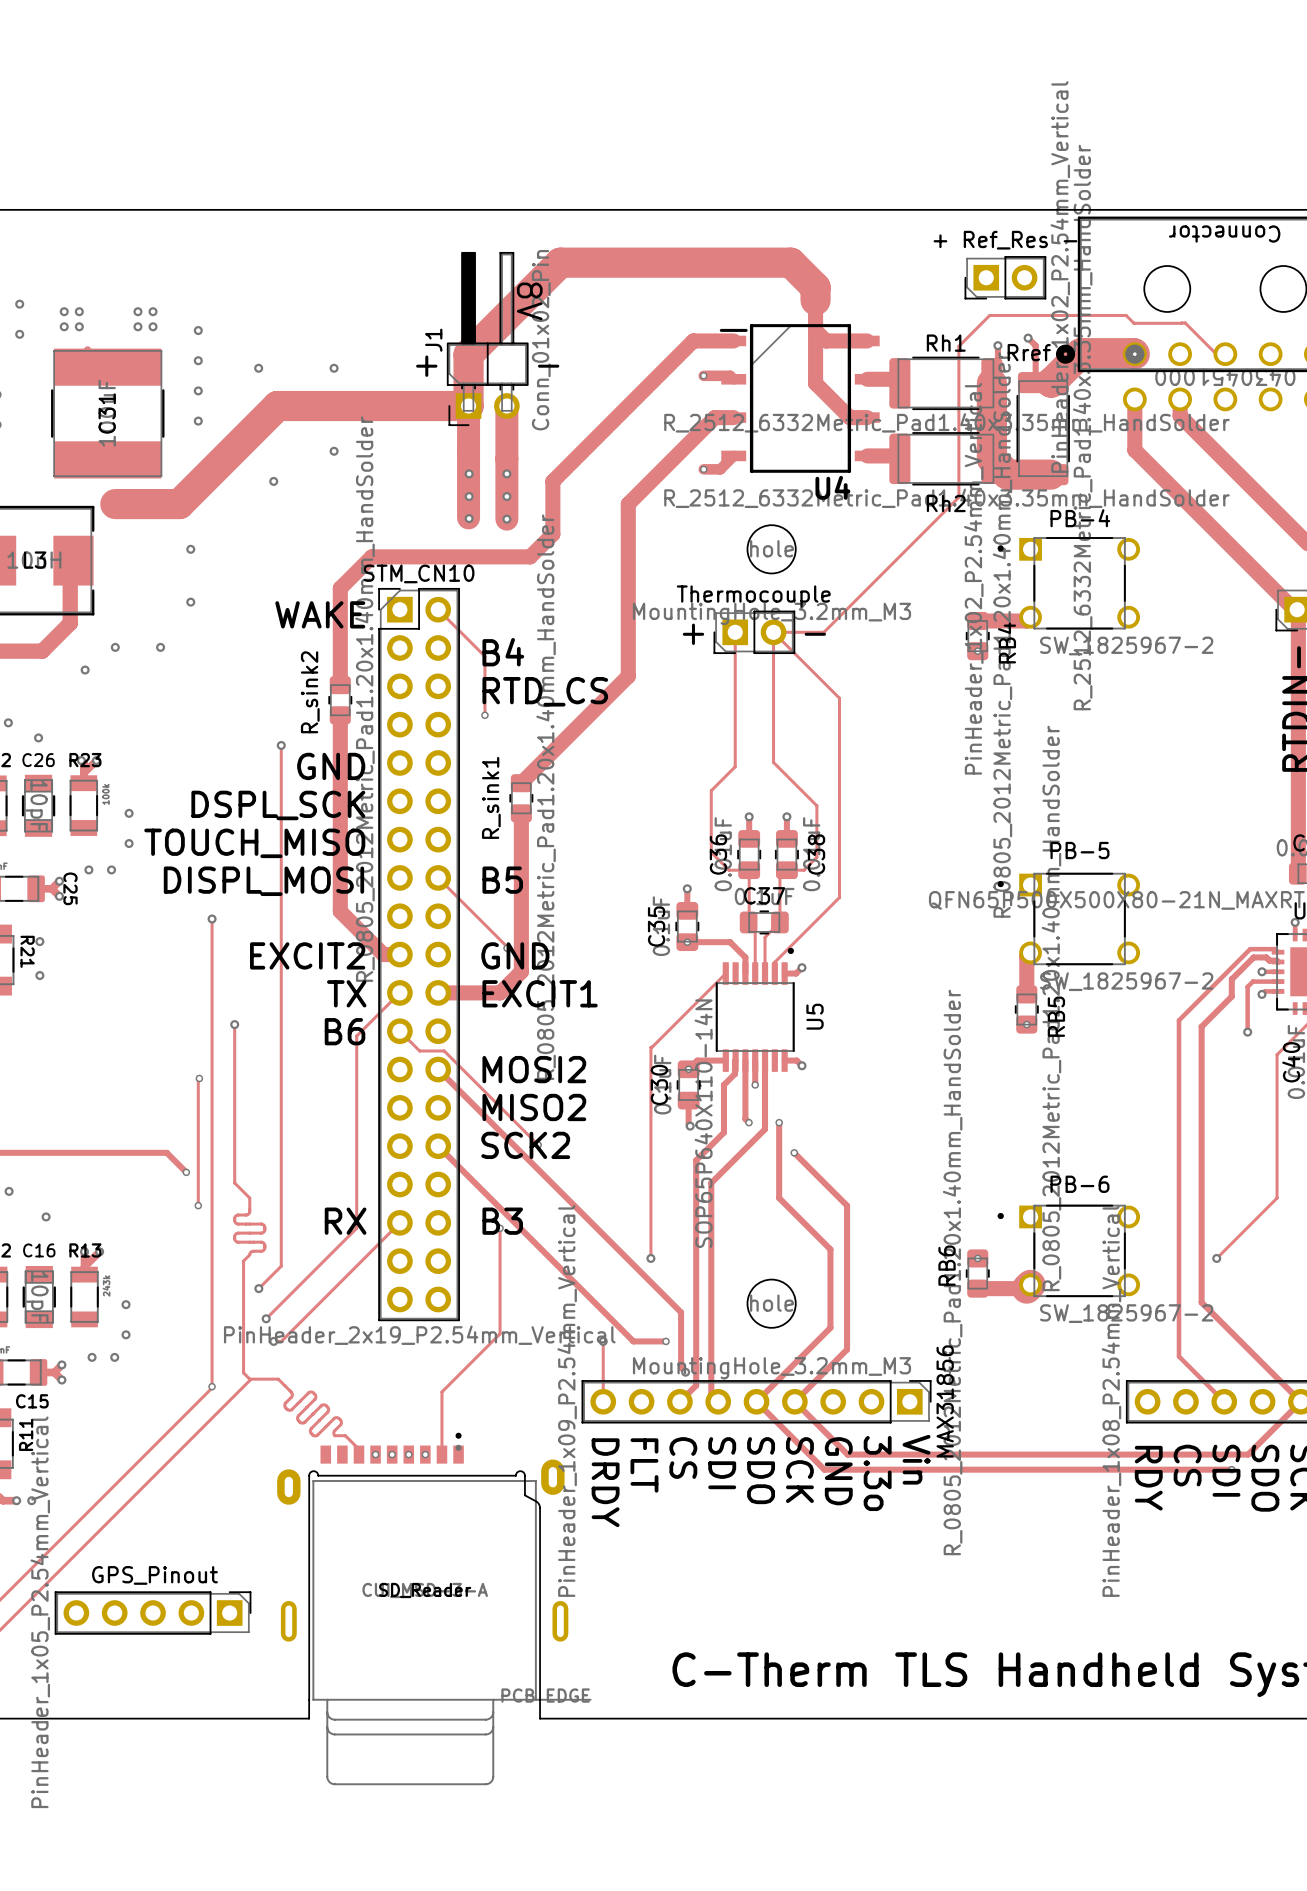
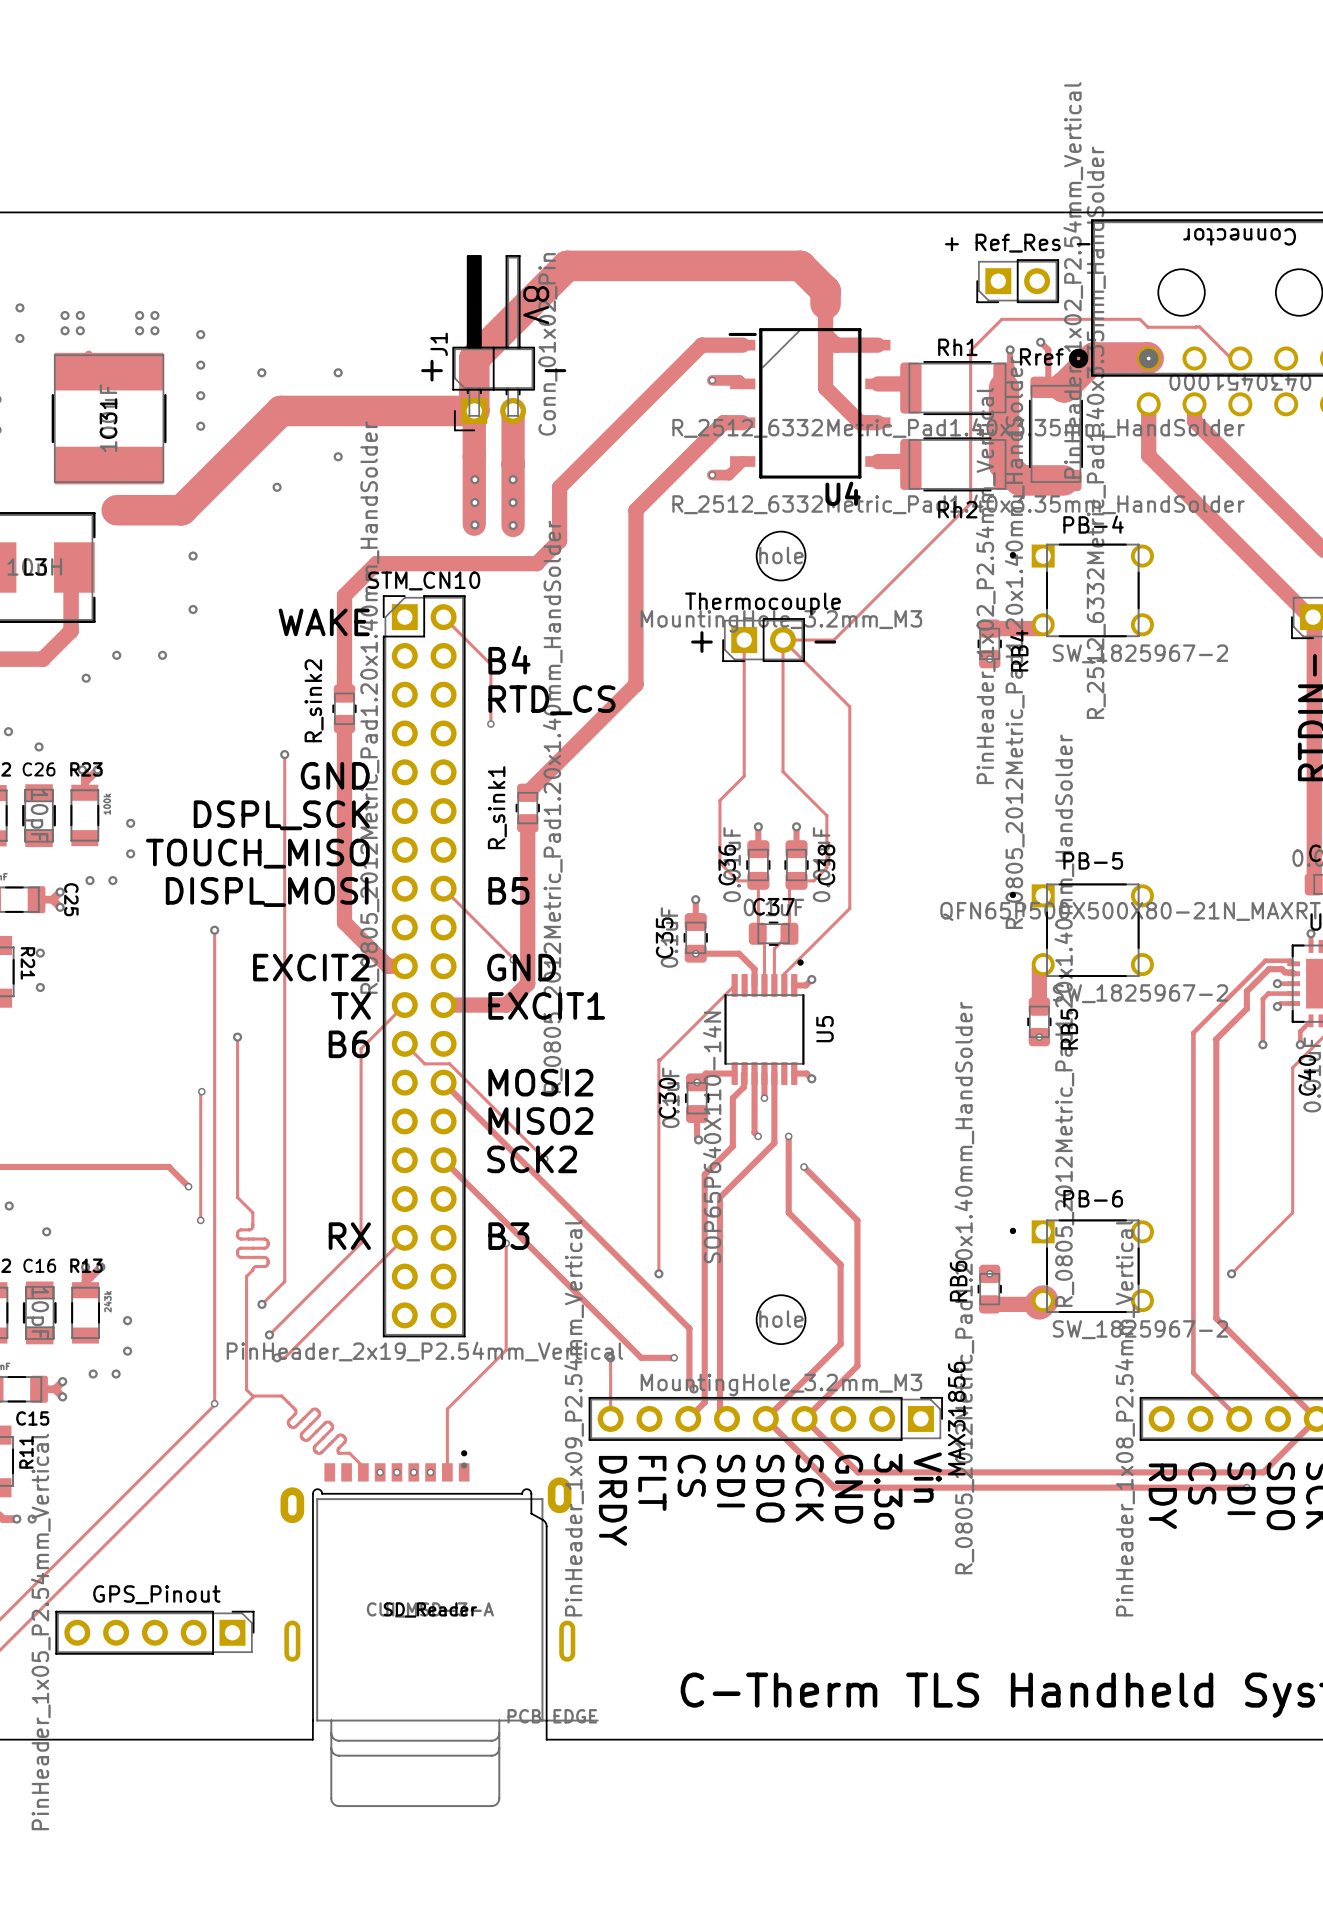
track: none -> (1311, 1020) (1300, 1031) (1300, 1044)
via: none -> (1300, 1044)

